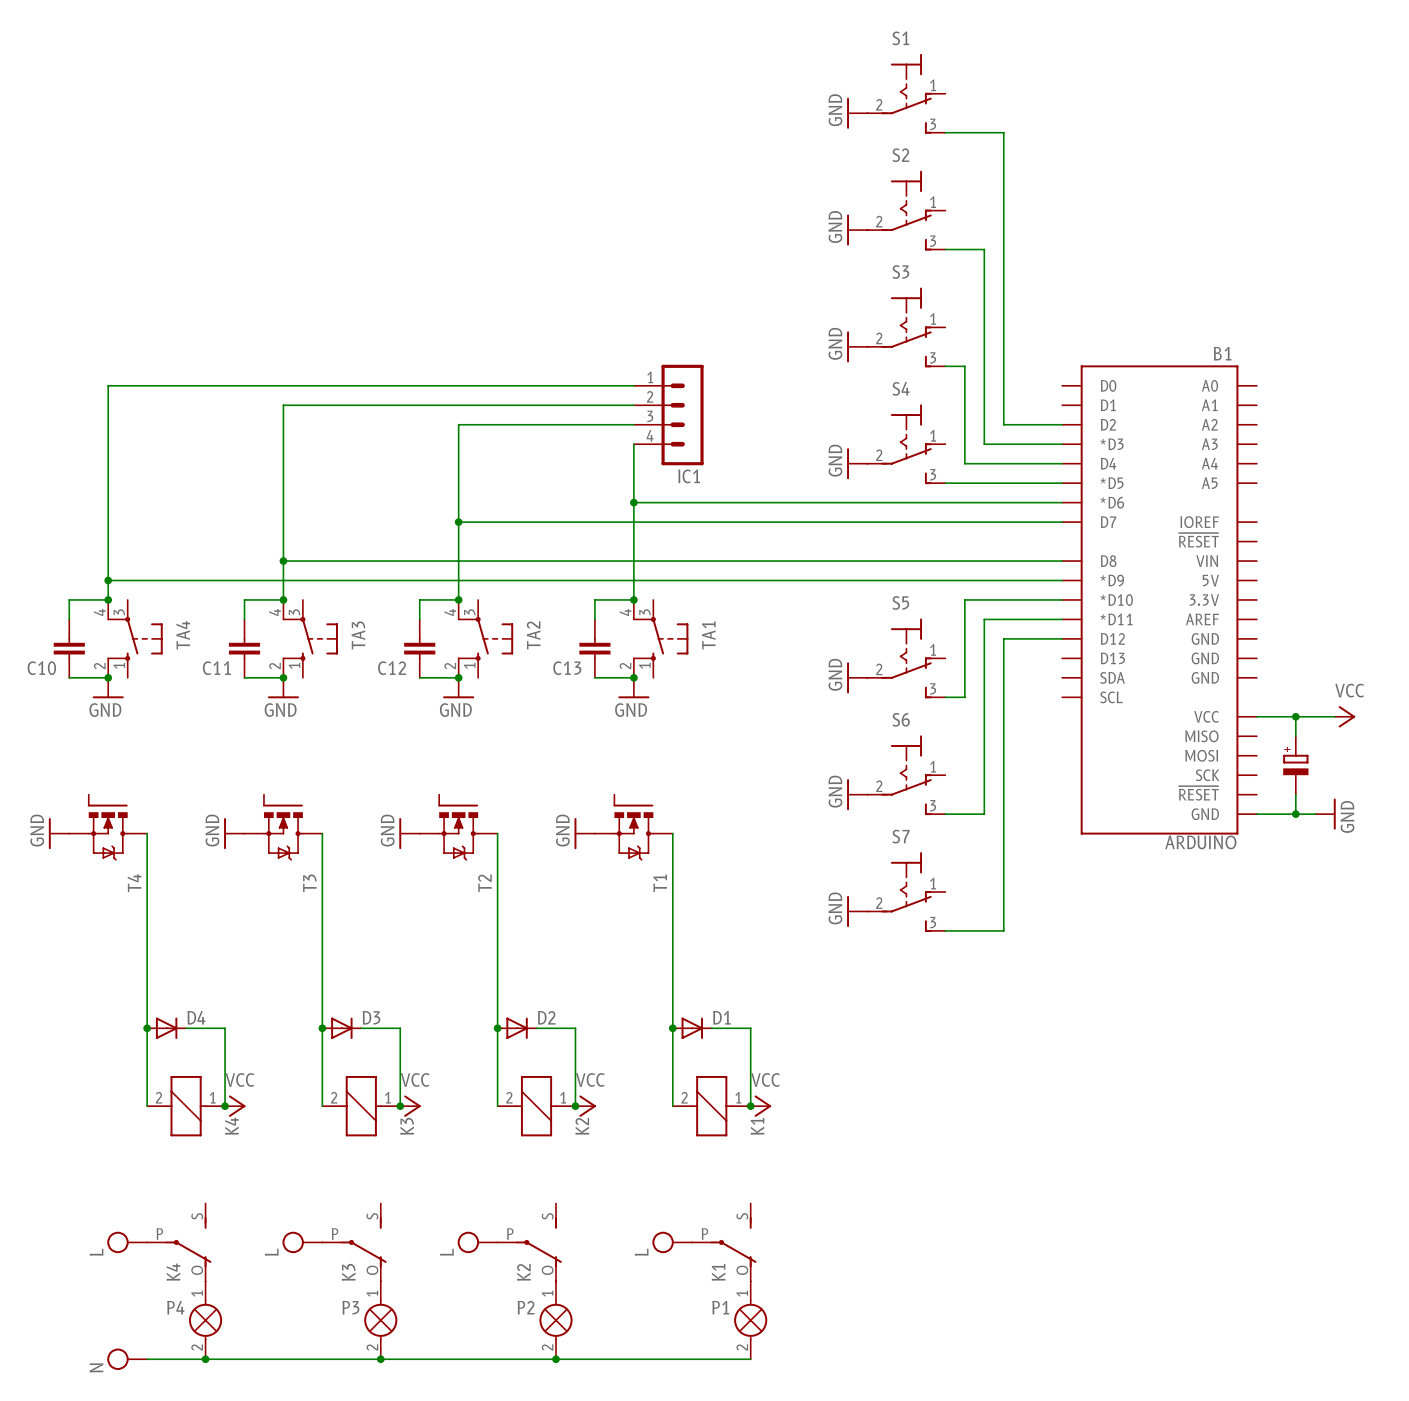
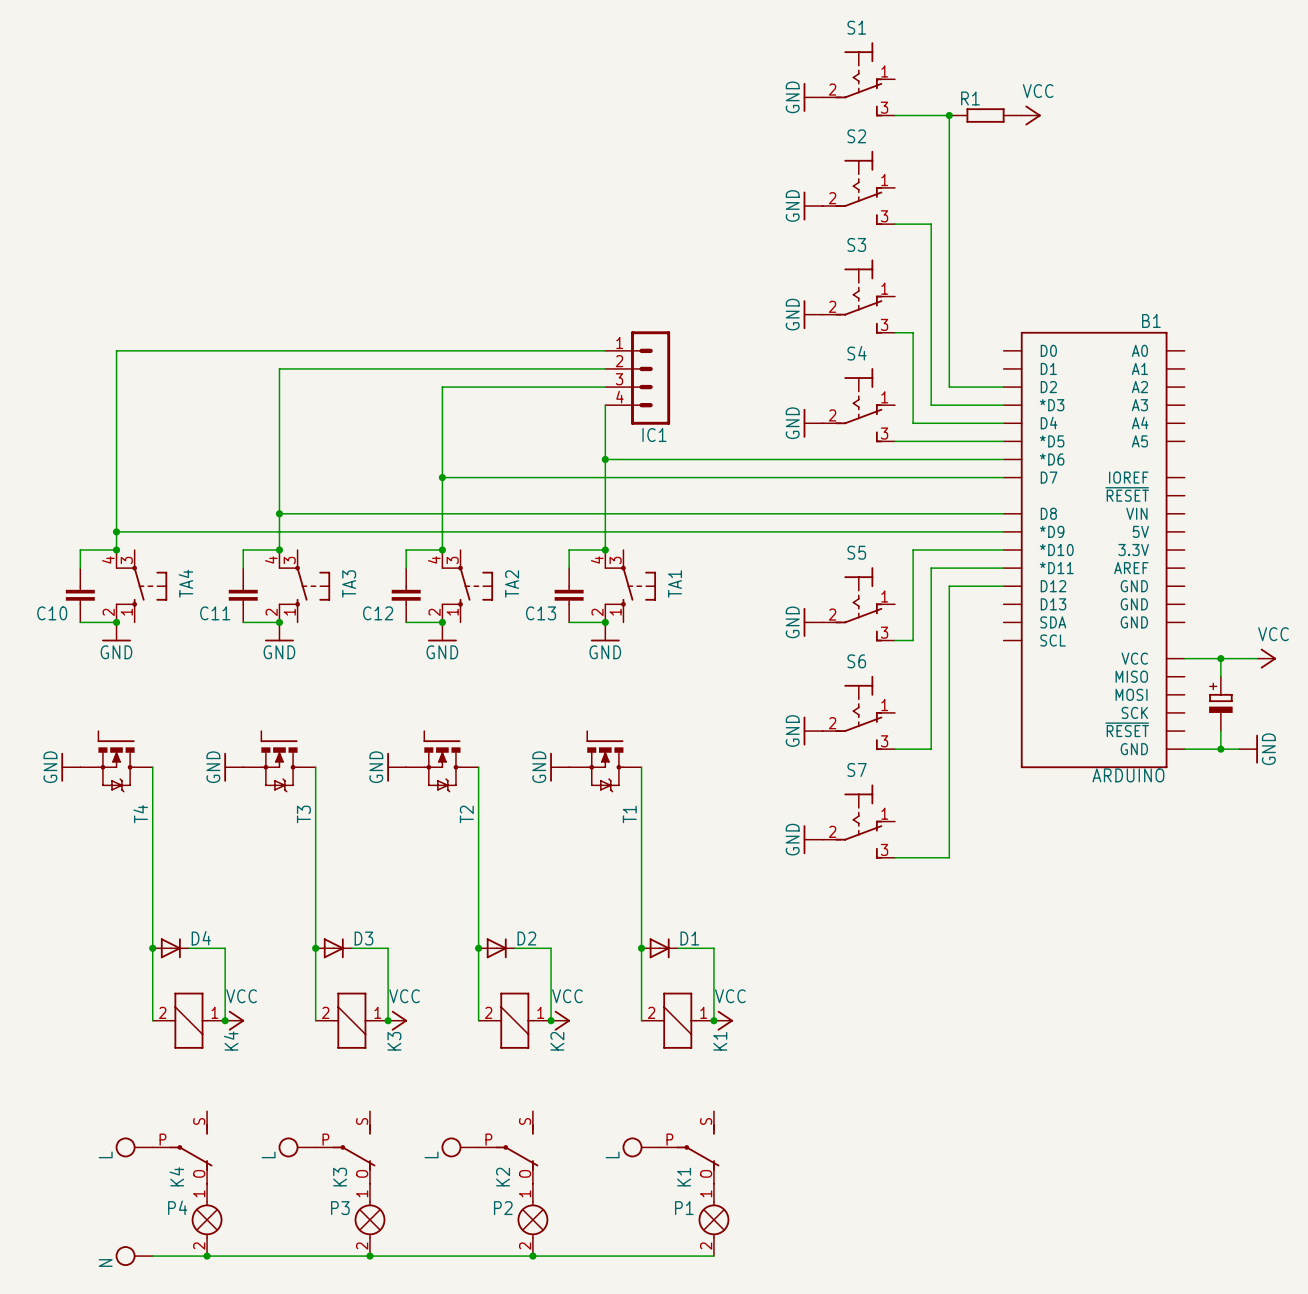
junction: none -> (949, 115)
R1: none -> (985, 115)
power symbol: none -> VCC (1031, 115)

